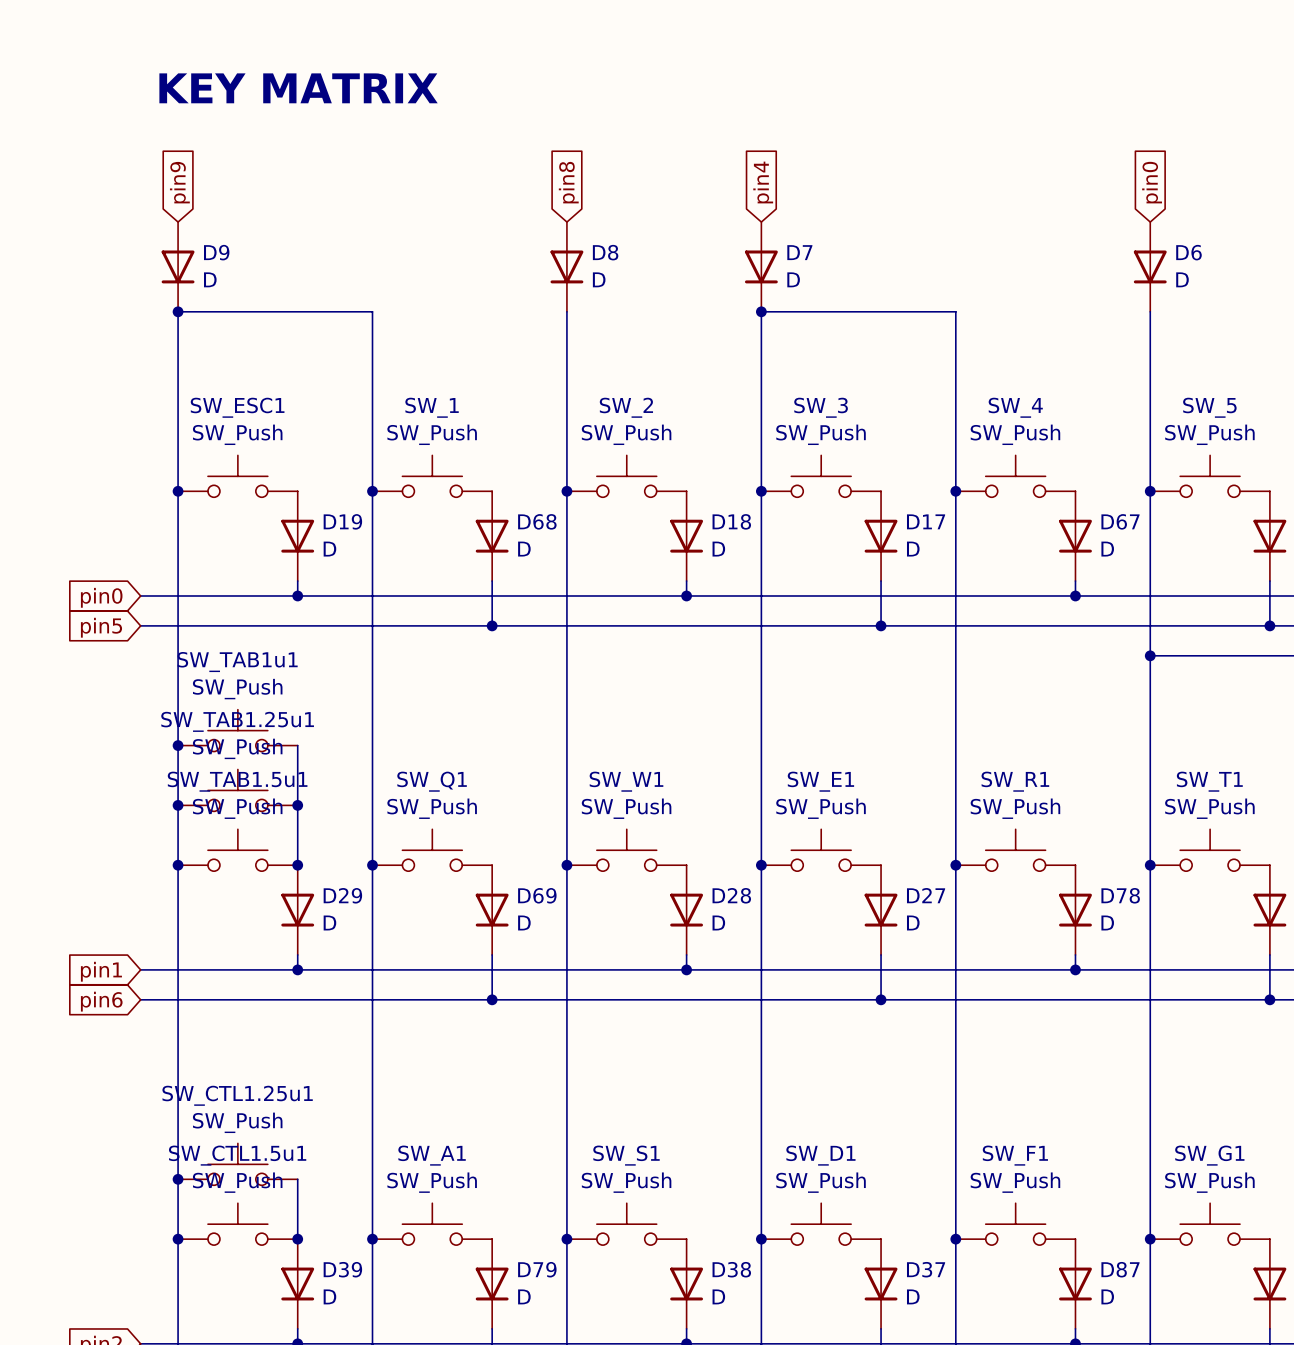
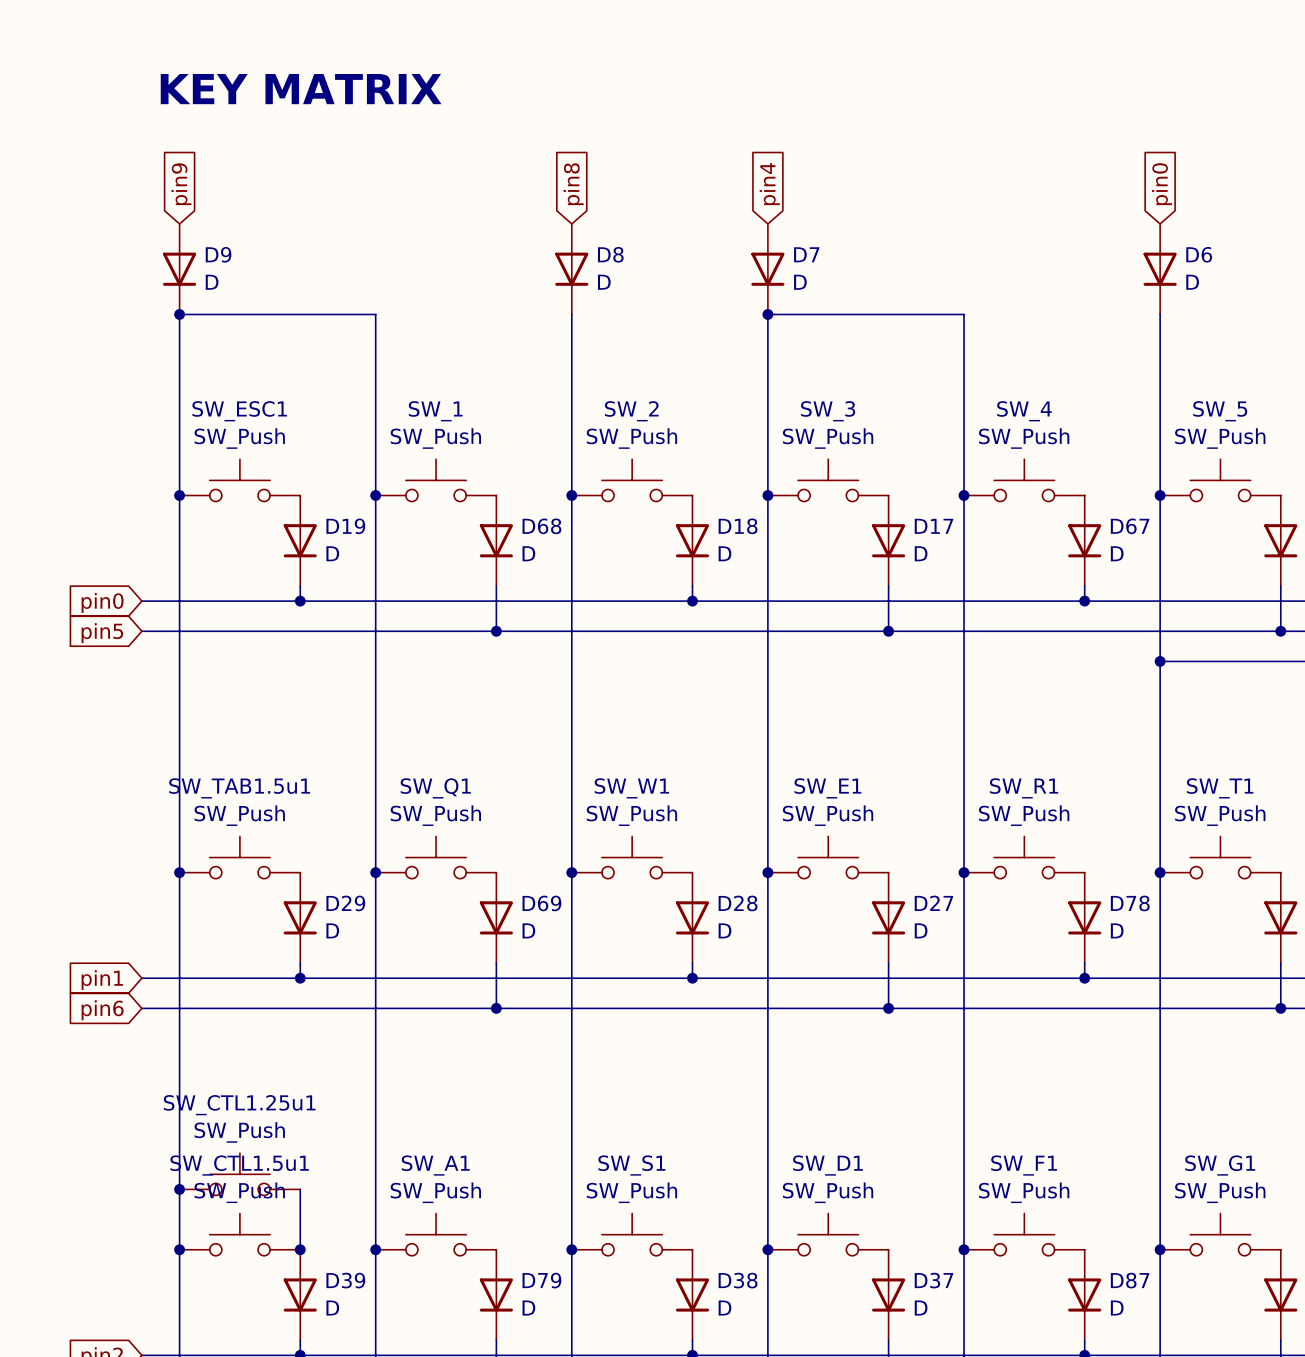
SW_TAB1u1: SW_Push (237, 730) -> none
junction: (178, 745) -> none
wire: (297, 745) (297, 865) -> none
SW_TAB1.25u1: SW_Push (237, 790) -> none
junction: (178, 805) -> none
junction: (297, 805) -> none
junction: (297, 865) -> none

